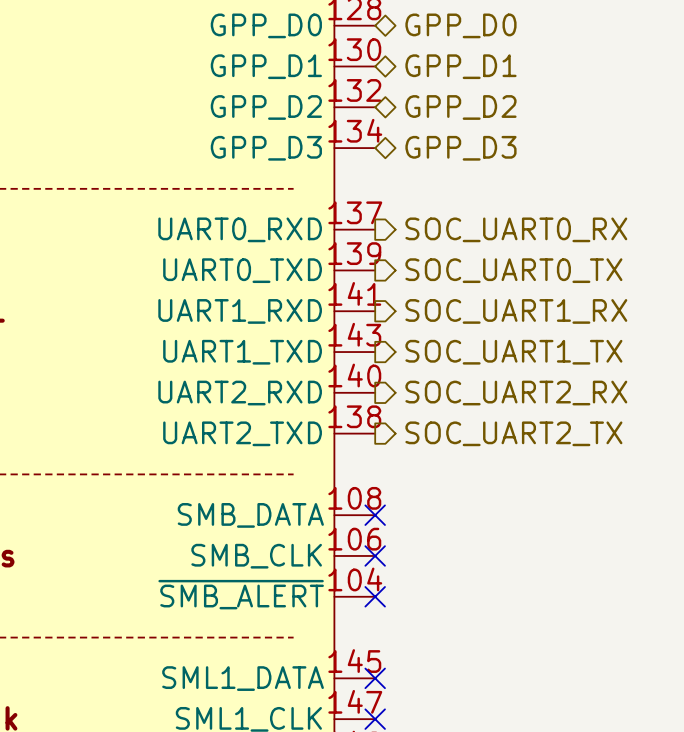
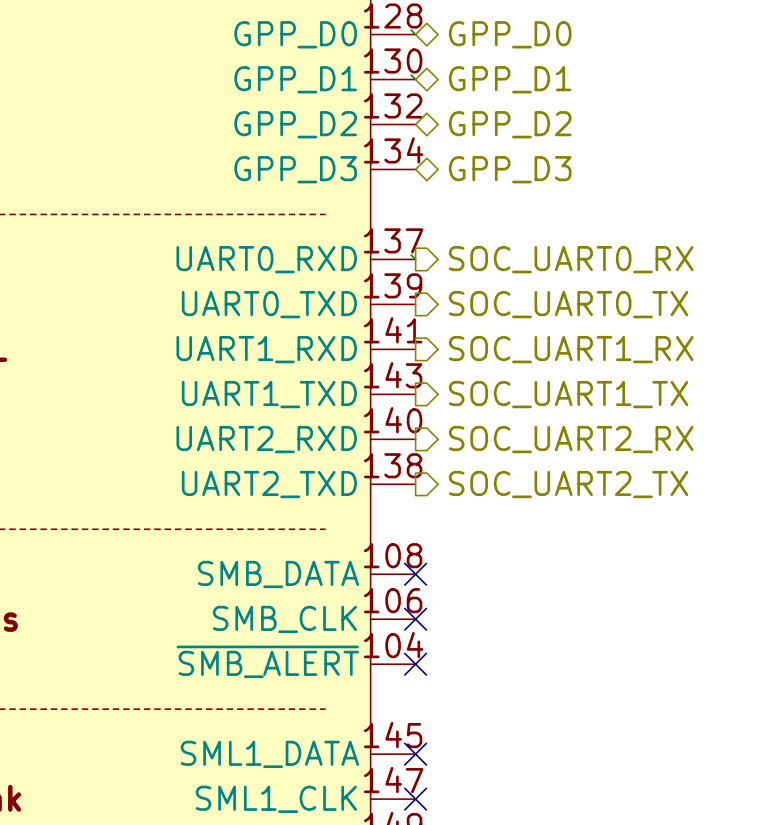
wire: none -> (411, 30) (415, 34)
wire: none -> (411, 75) (415, 79)
wire: none -> (411, 254) (415, 259)

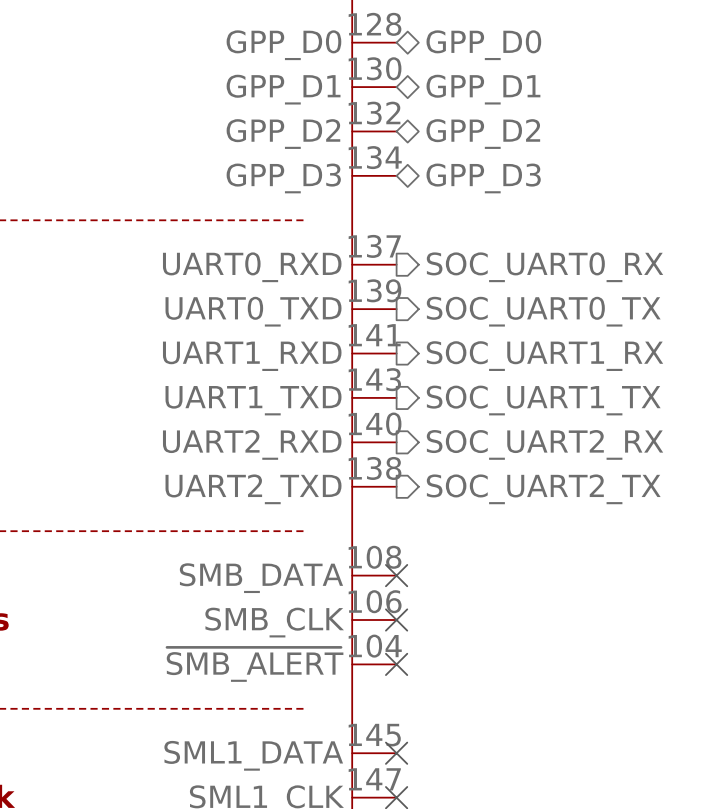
wire: (411, 30) (415, 34) -> none
wire: (411, 75) (415, 79) -> none
wire: (411, 254) (415, 259) -> none

